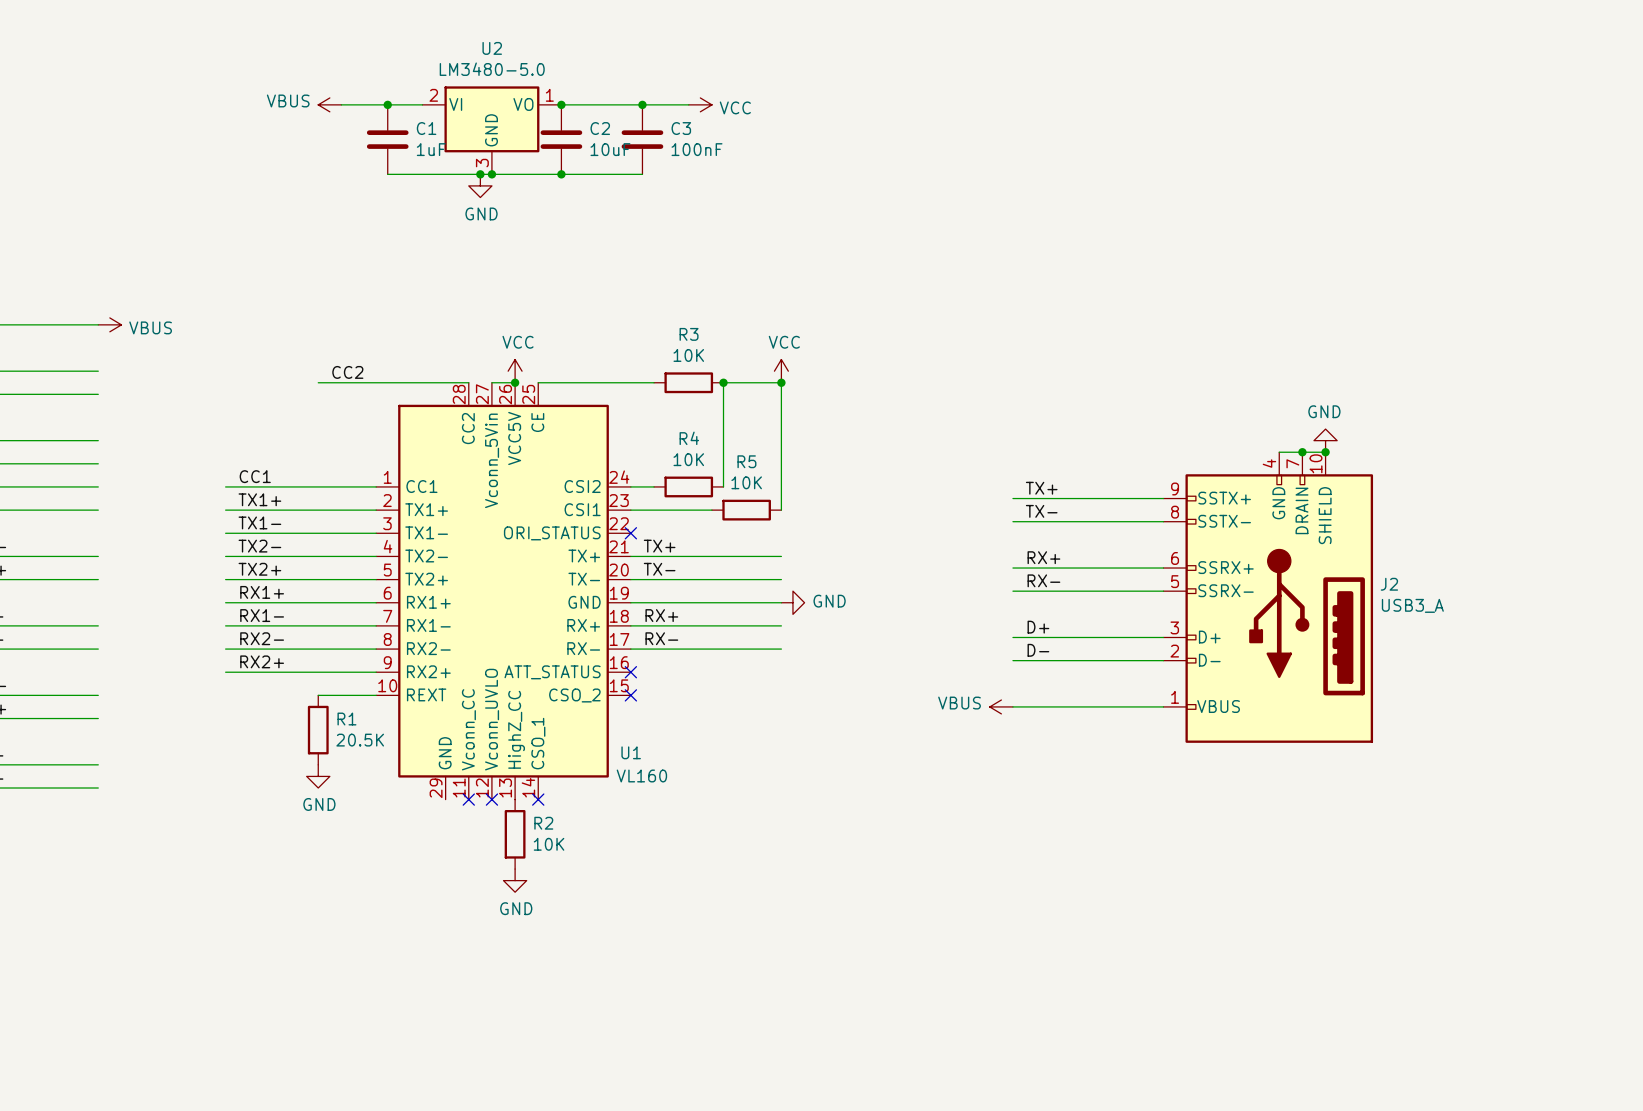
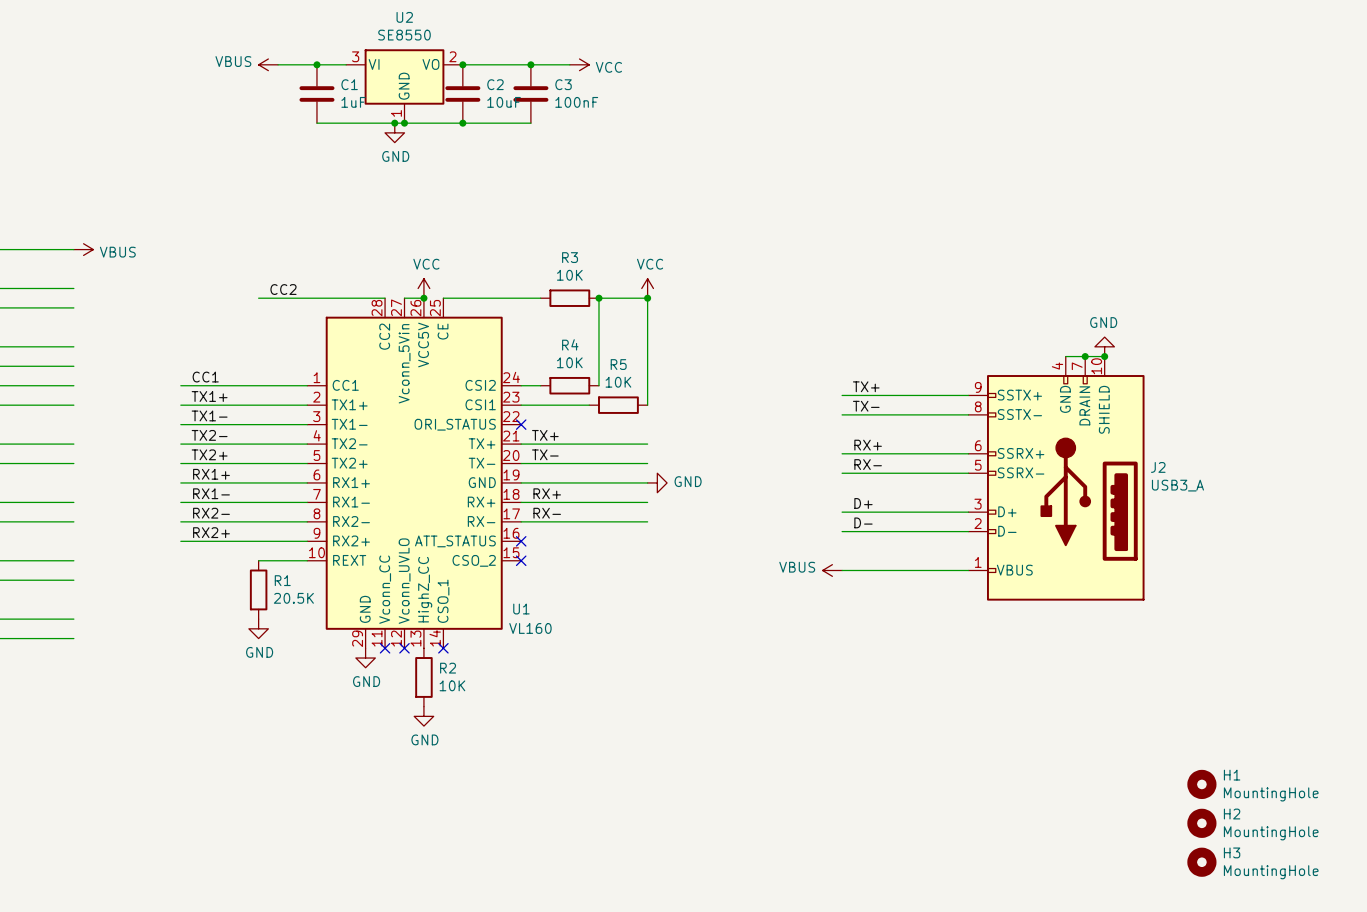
U2 value: LM3480-5.0 (492, 69) -> SE8550 (404, 35)
U2 pin number: 2 (433, 95) -> 3 (355, 56)
U2 pin number: 1 (549, 95) -> 2 (452, 56)
U2 pin number: 3 (482, 163) -> 1 (396, 113)
power symbol: none -> GND (365, 658)
H1: none -> MountingHole (1201, 784)
H2: none -> MountingHole (1201, 823)
H3: none -> MountingHole (1201, 862)

